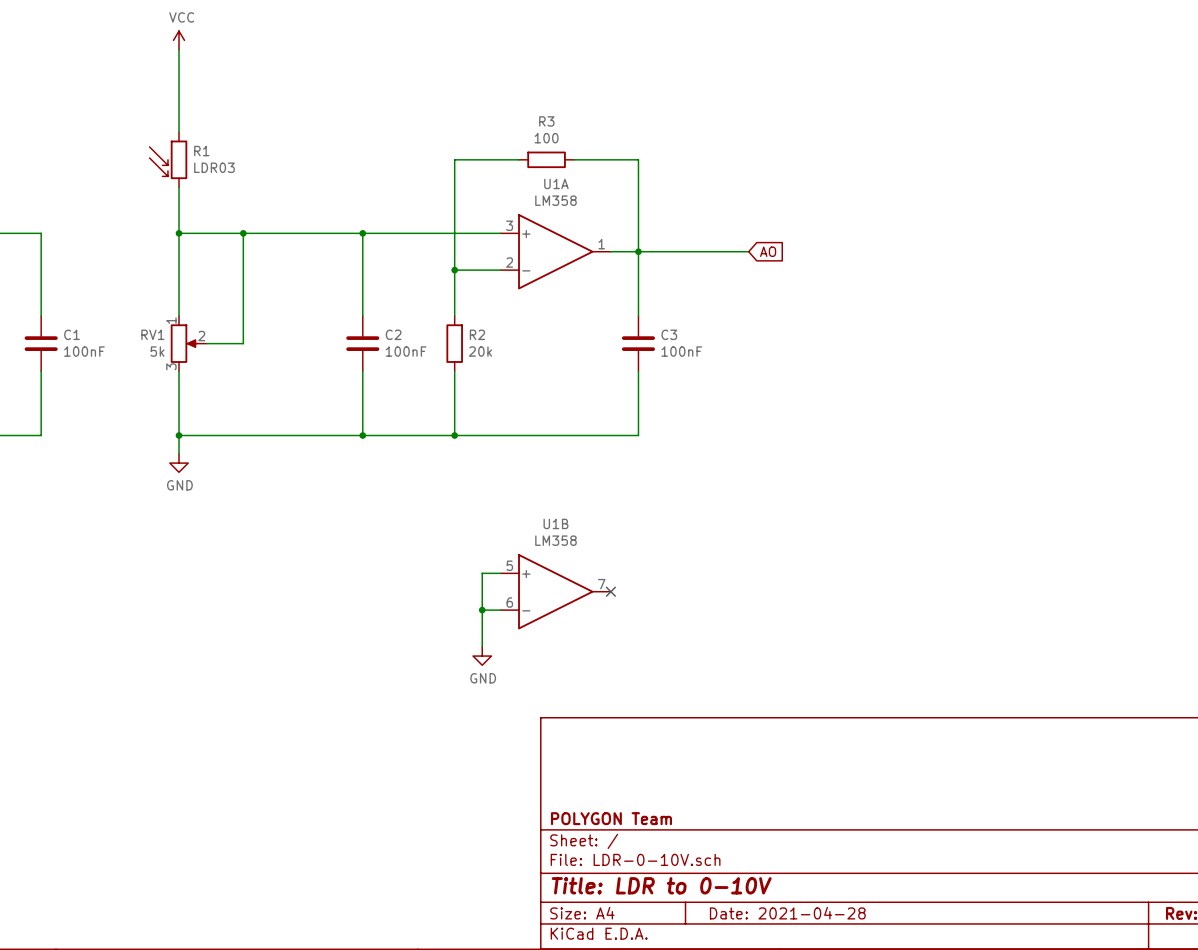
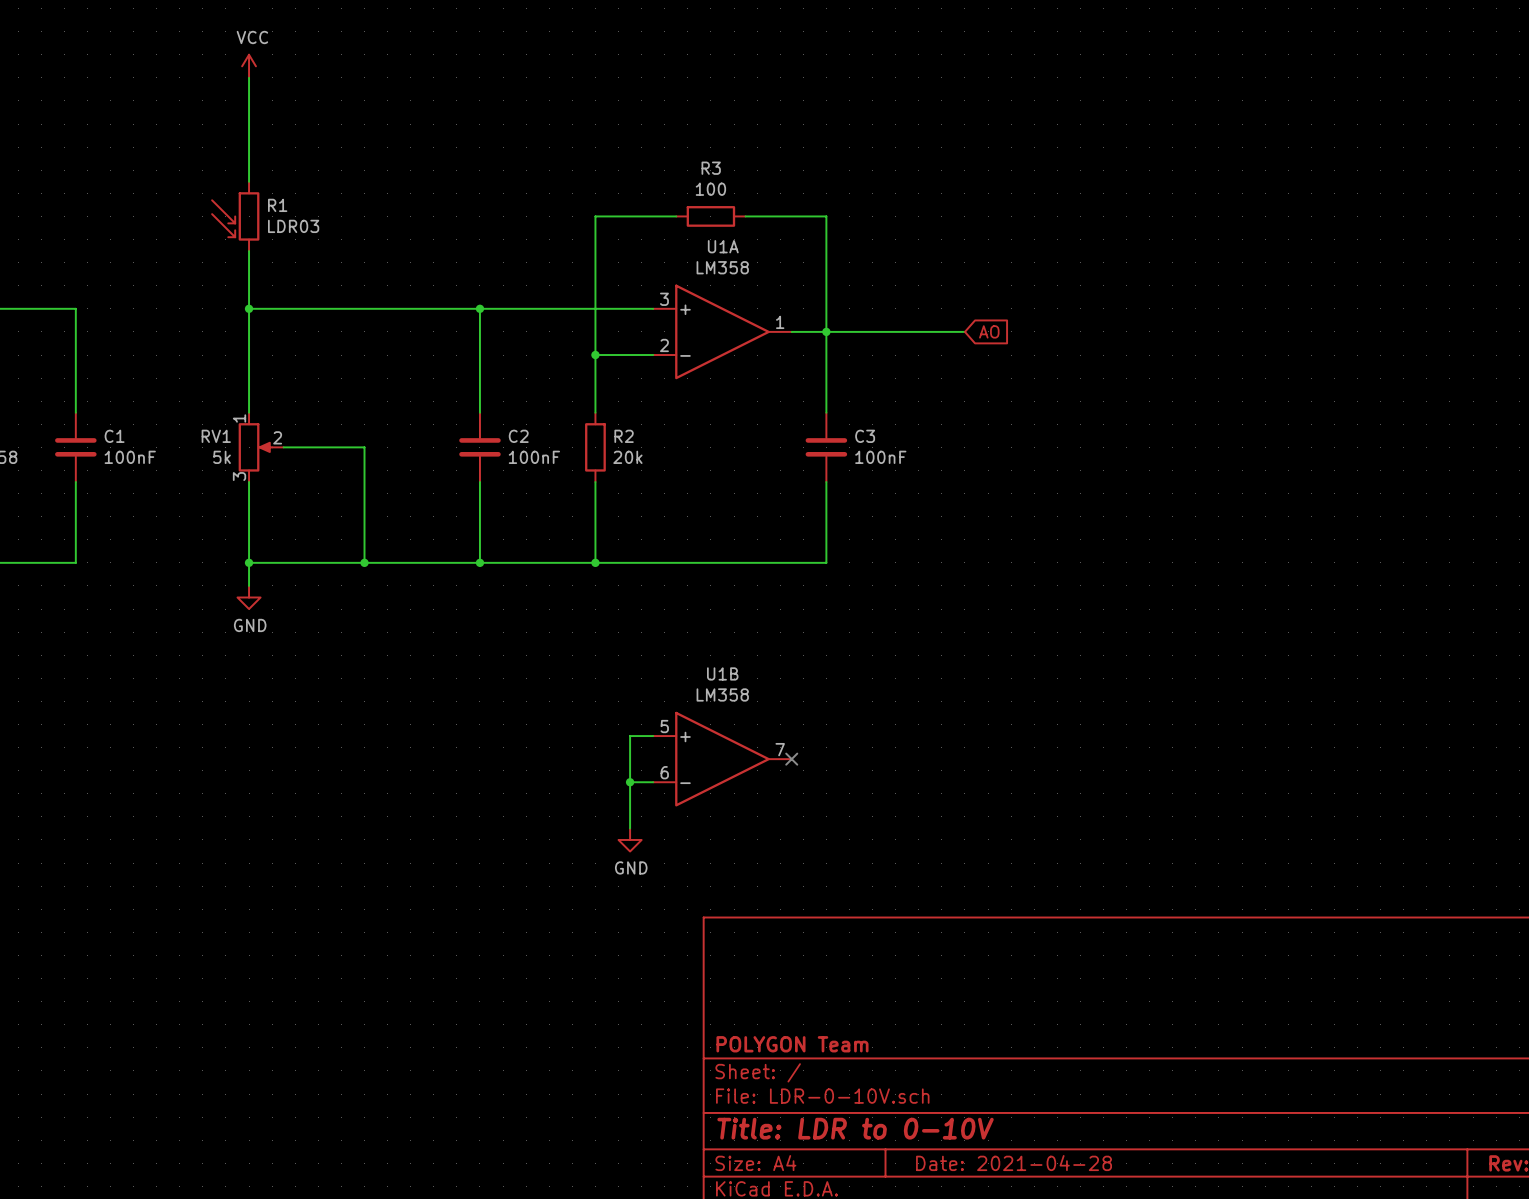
wire: (243, 233) (243, 343) -> (364, 562) (364, 447) (329, 447)
junction: (243, 233) -> none
junction: none -> (364, 562)

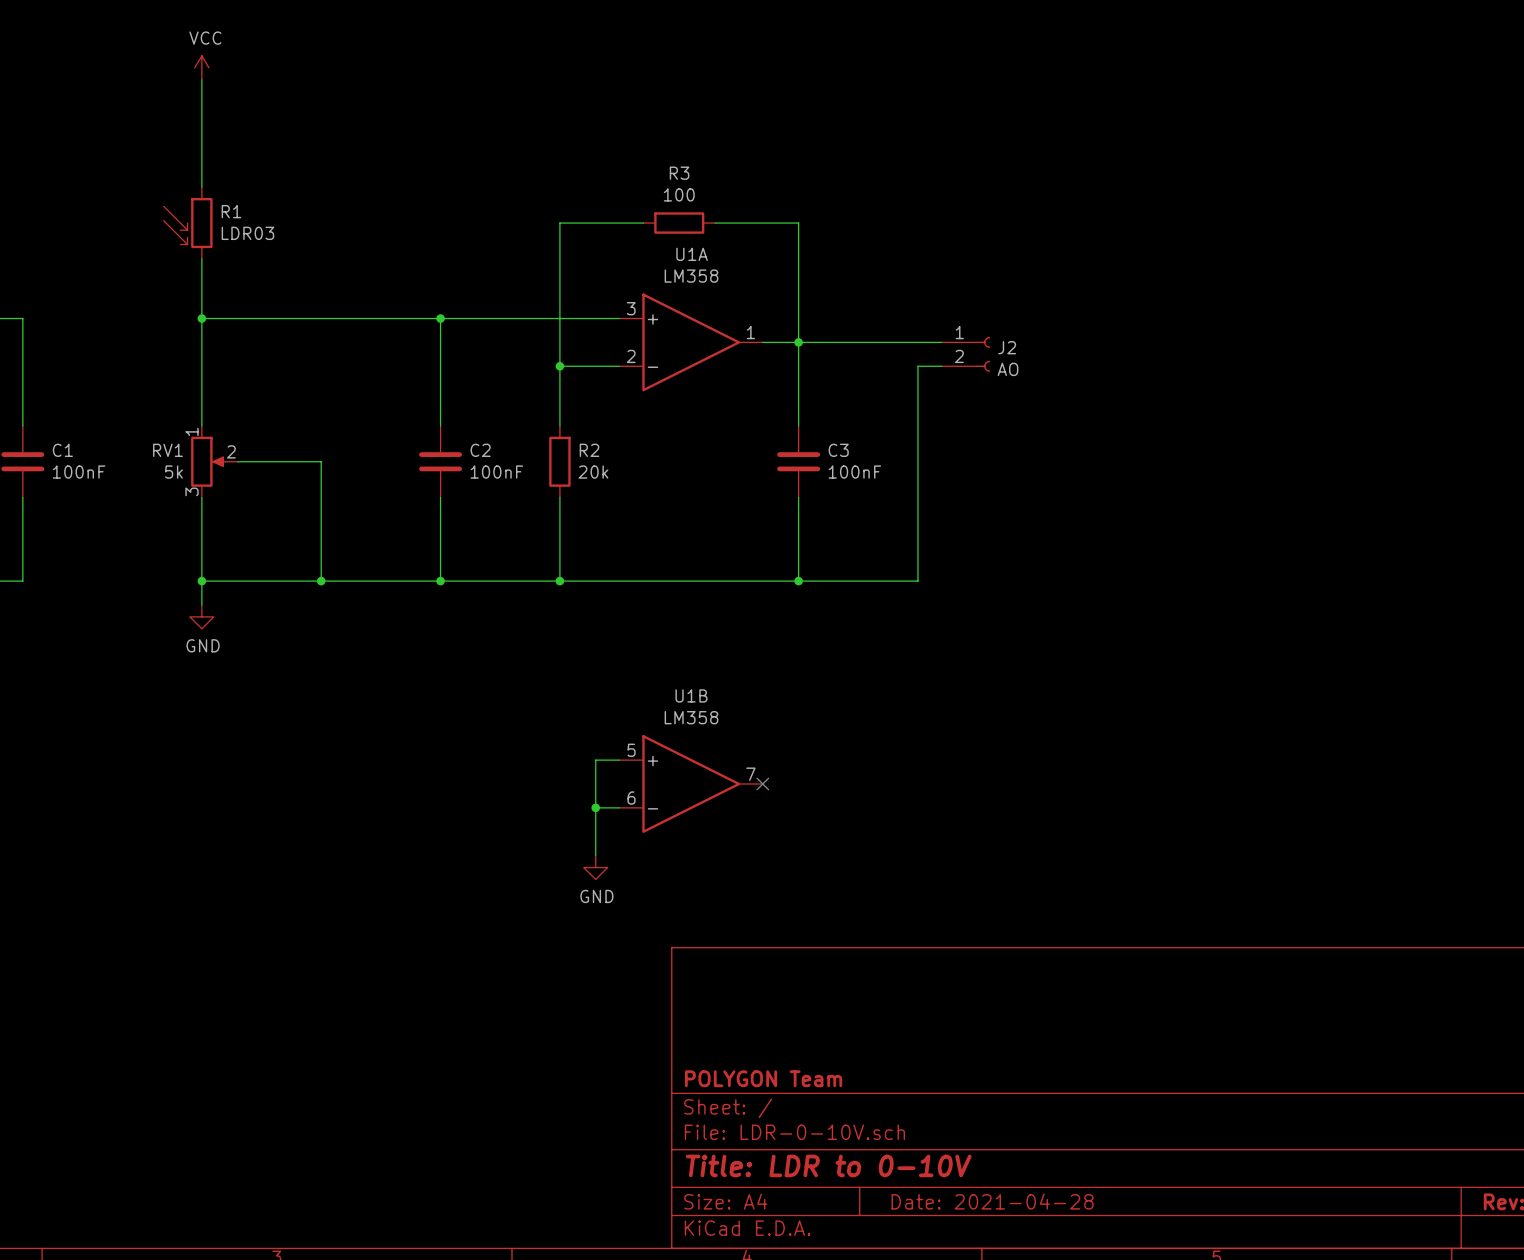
global label: AO (989, 331) -> none
J2: none -> AO (966, 354)
wire: none -> (941, 366) (917, 366) (917, 581) (798, 581)
junction: none -> (798, 581)

